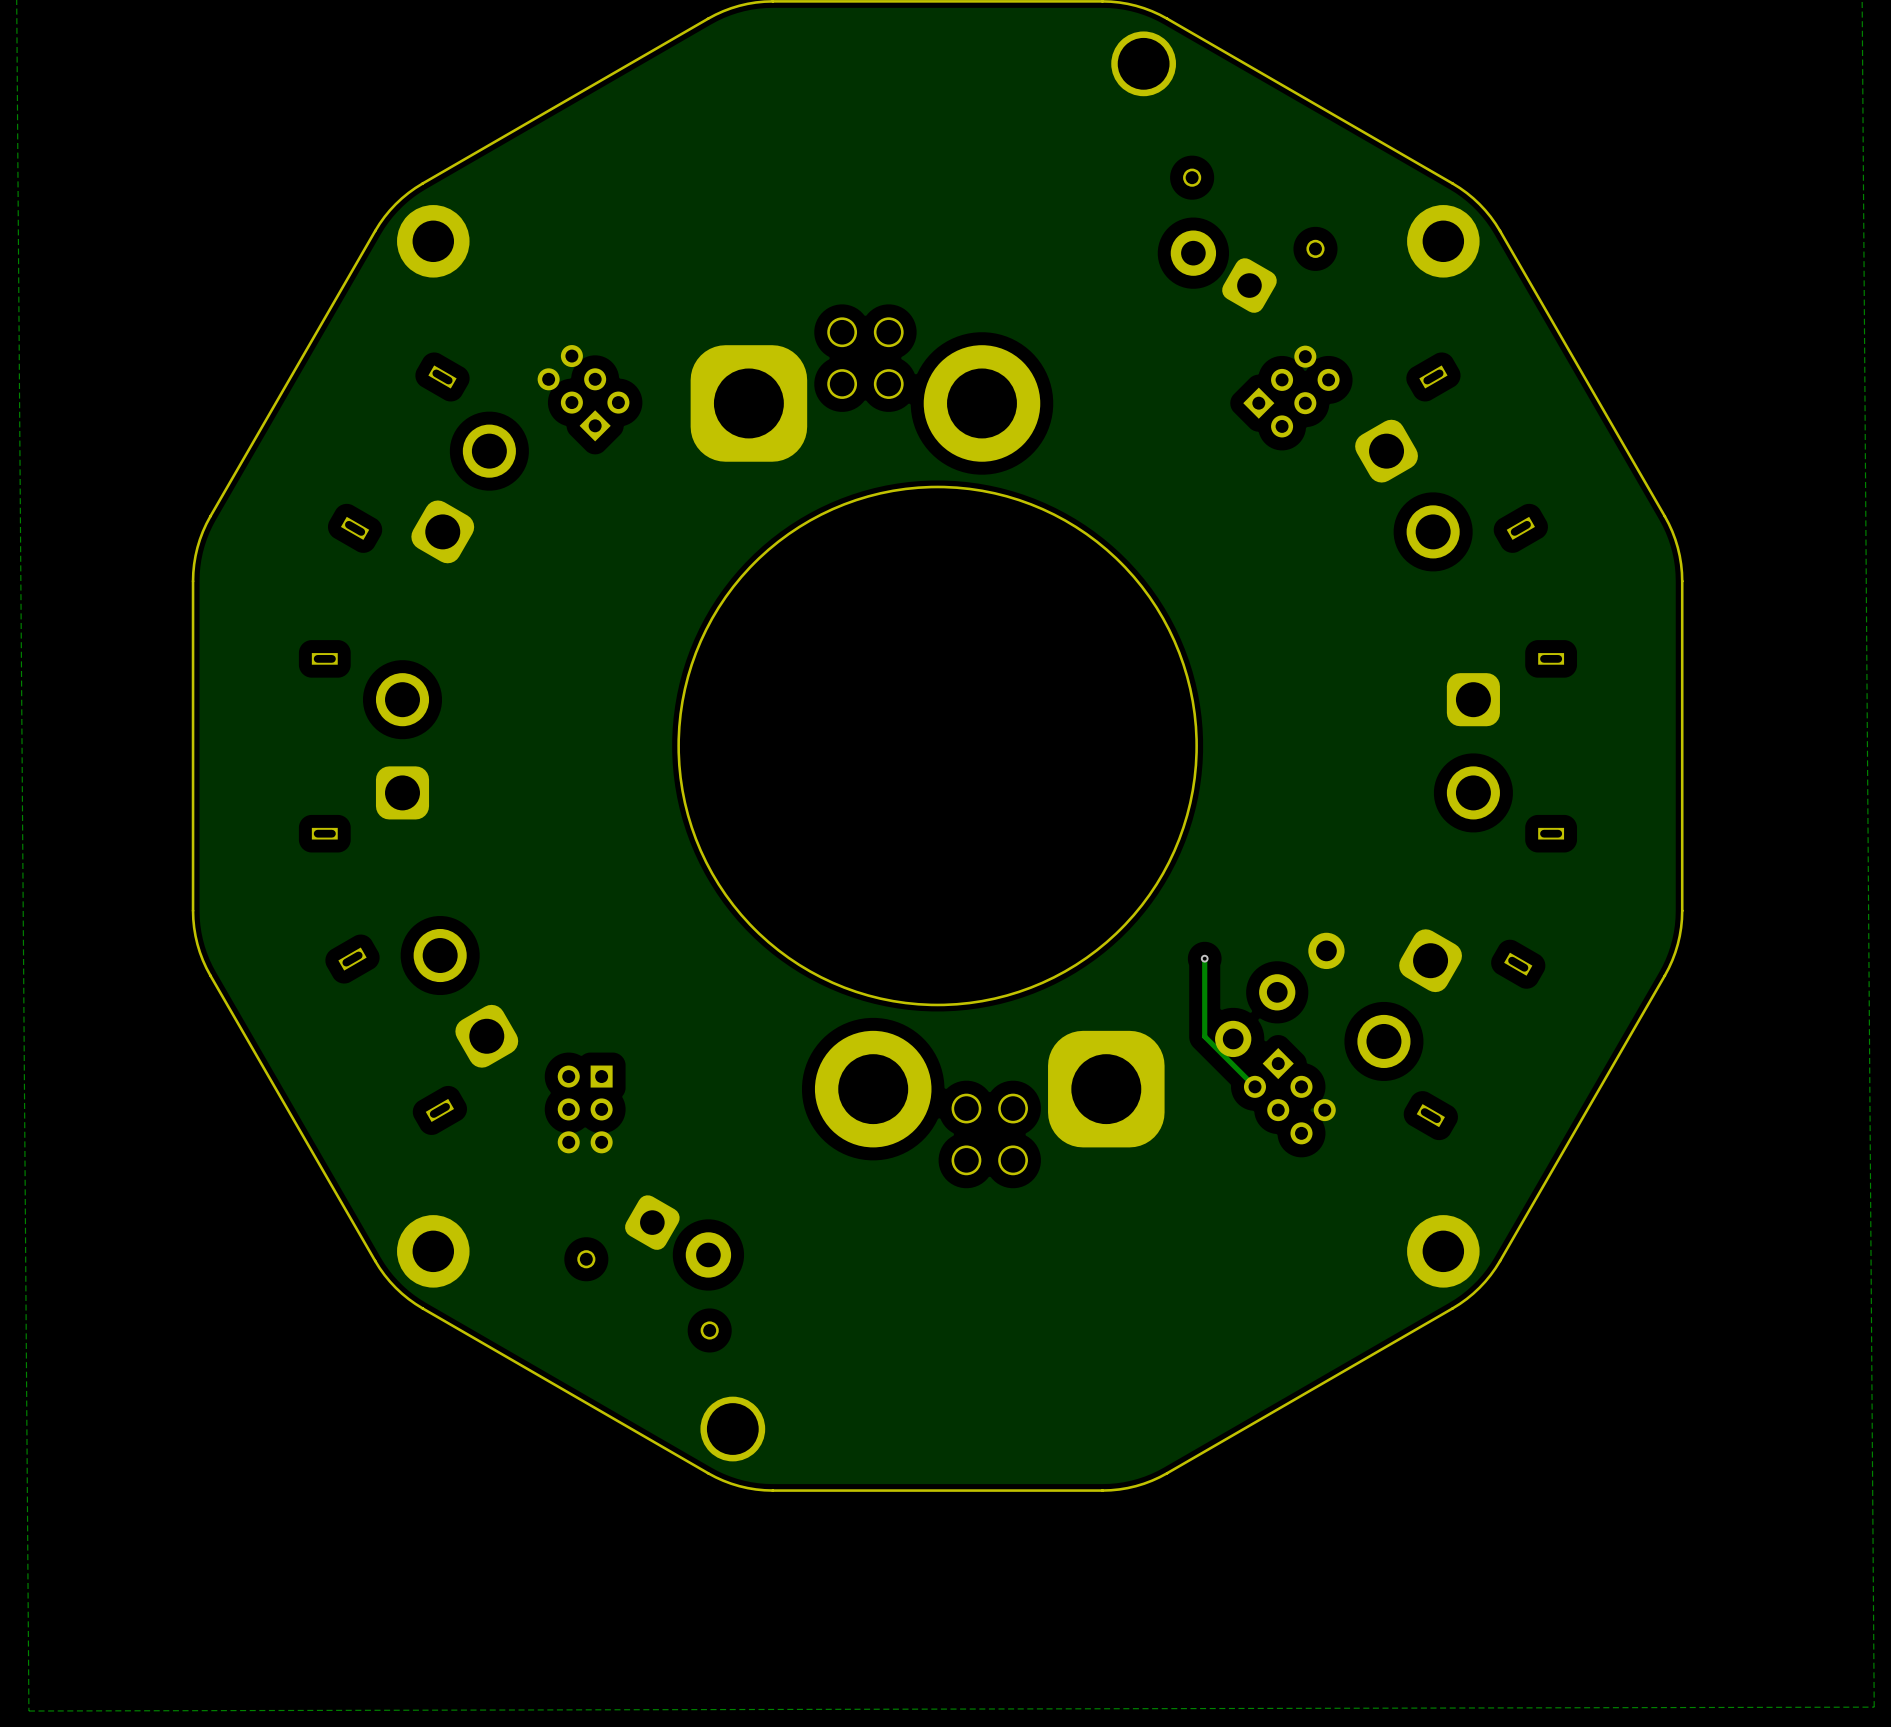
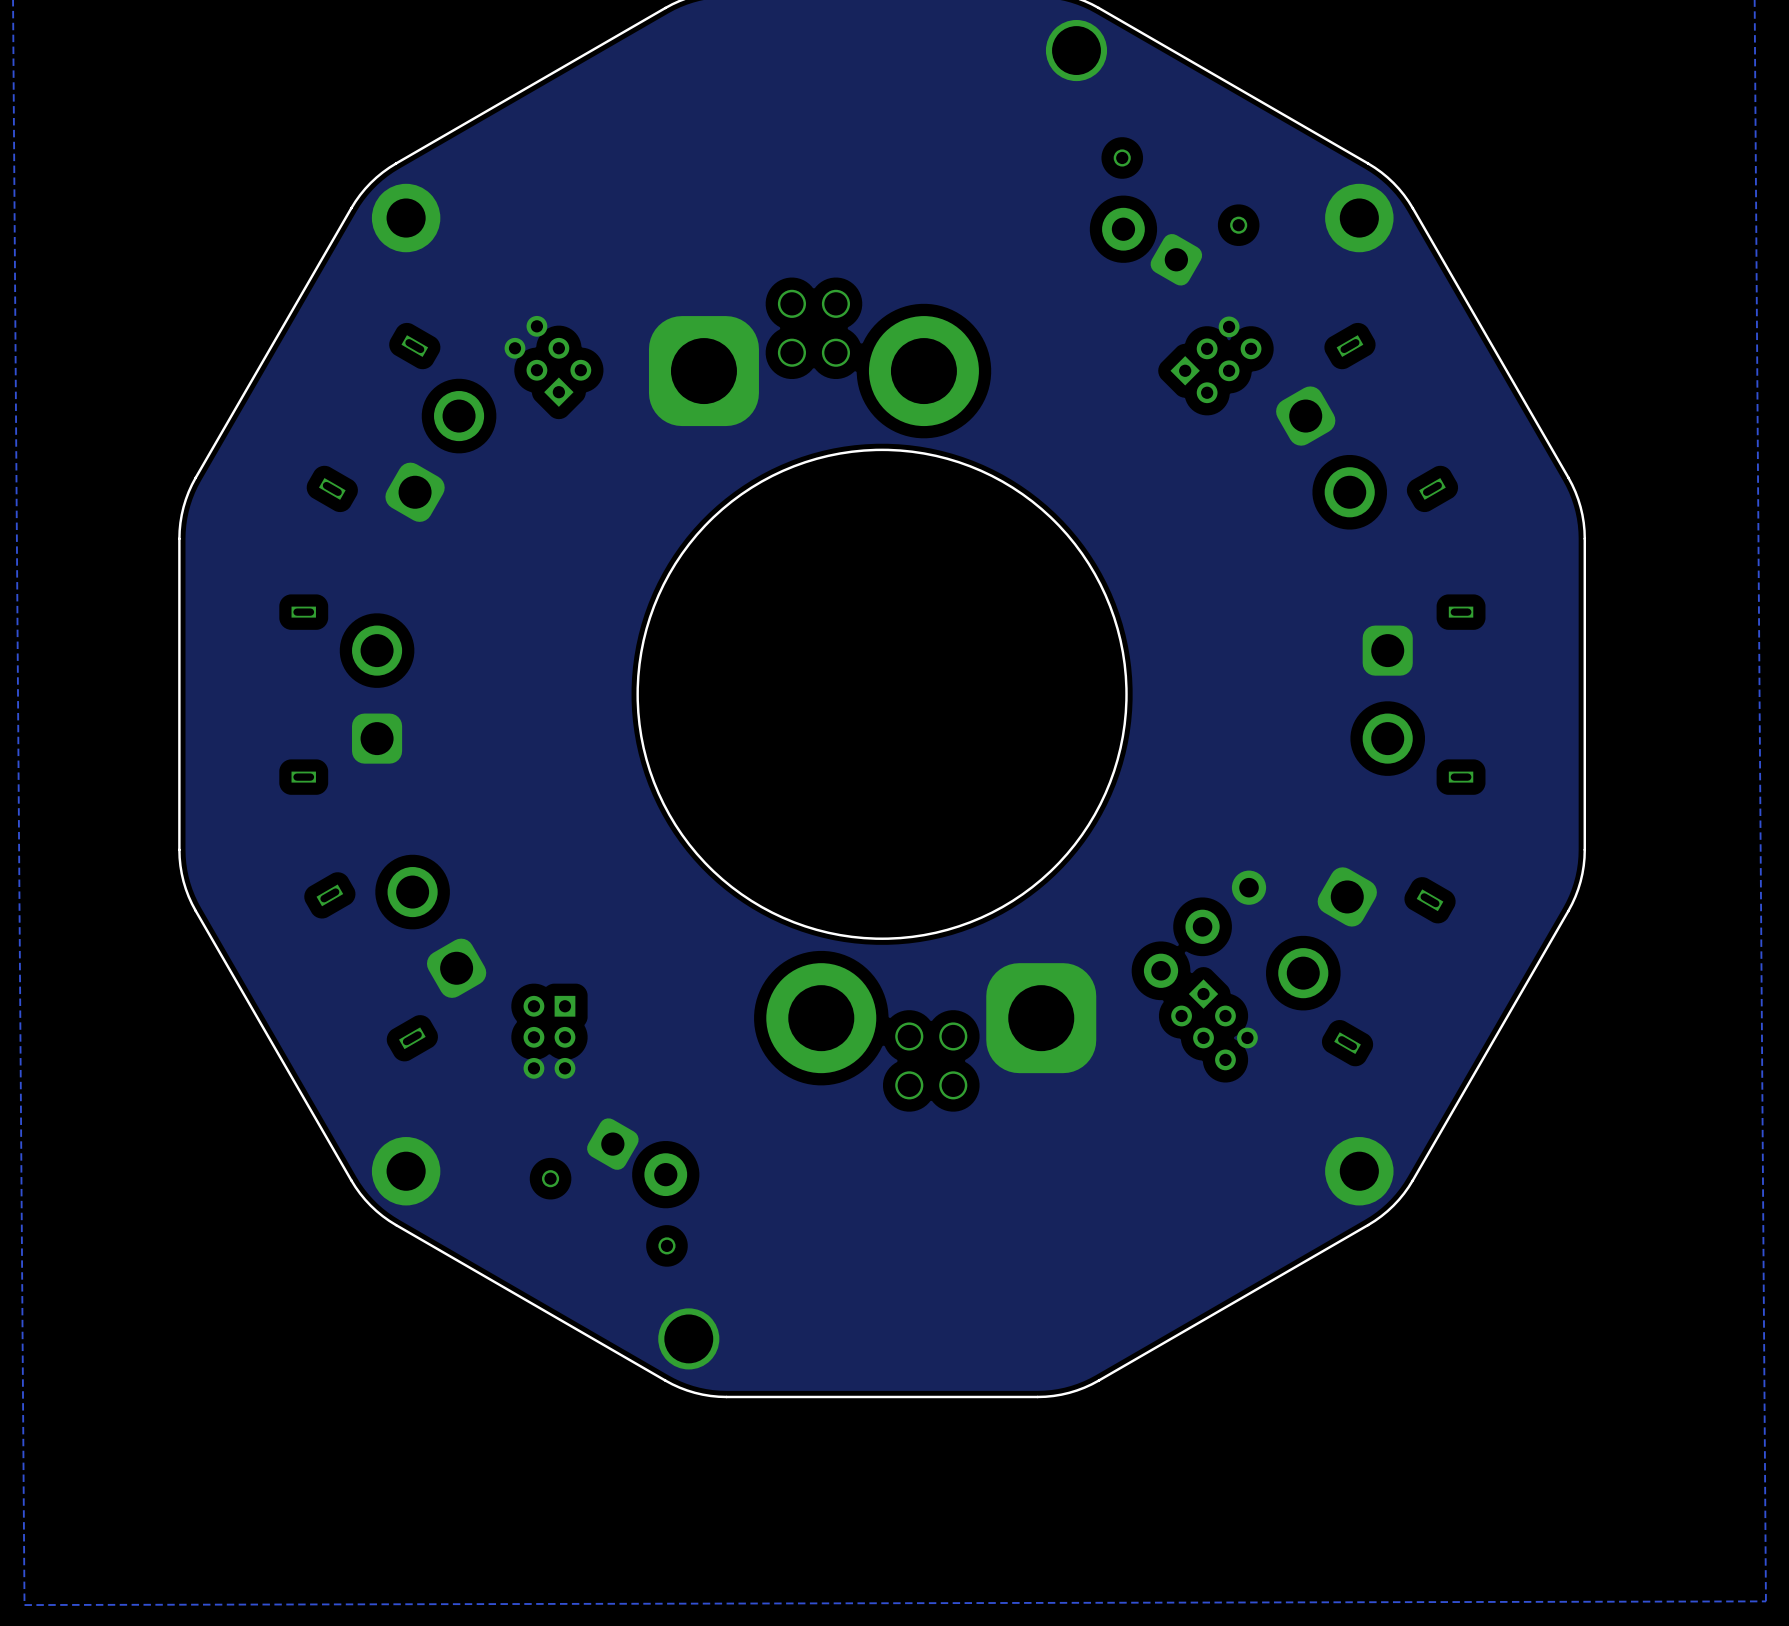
track: (1204, 958) (1204, 1036) (1254, 1086) -> none
via: (1204, 958) -> none

